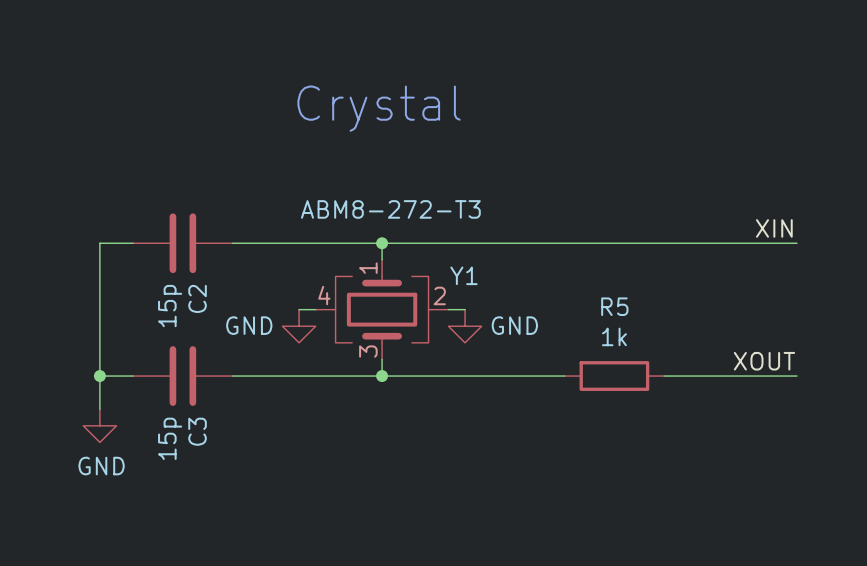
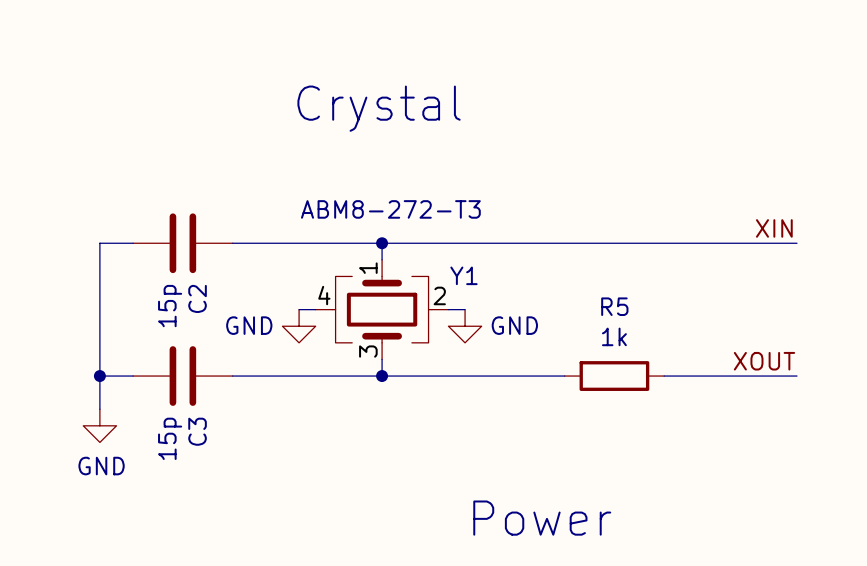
text: none -> Power (542, 518)

